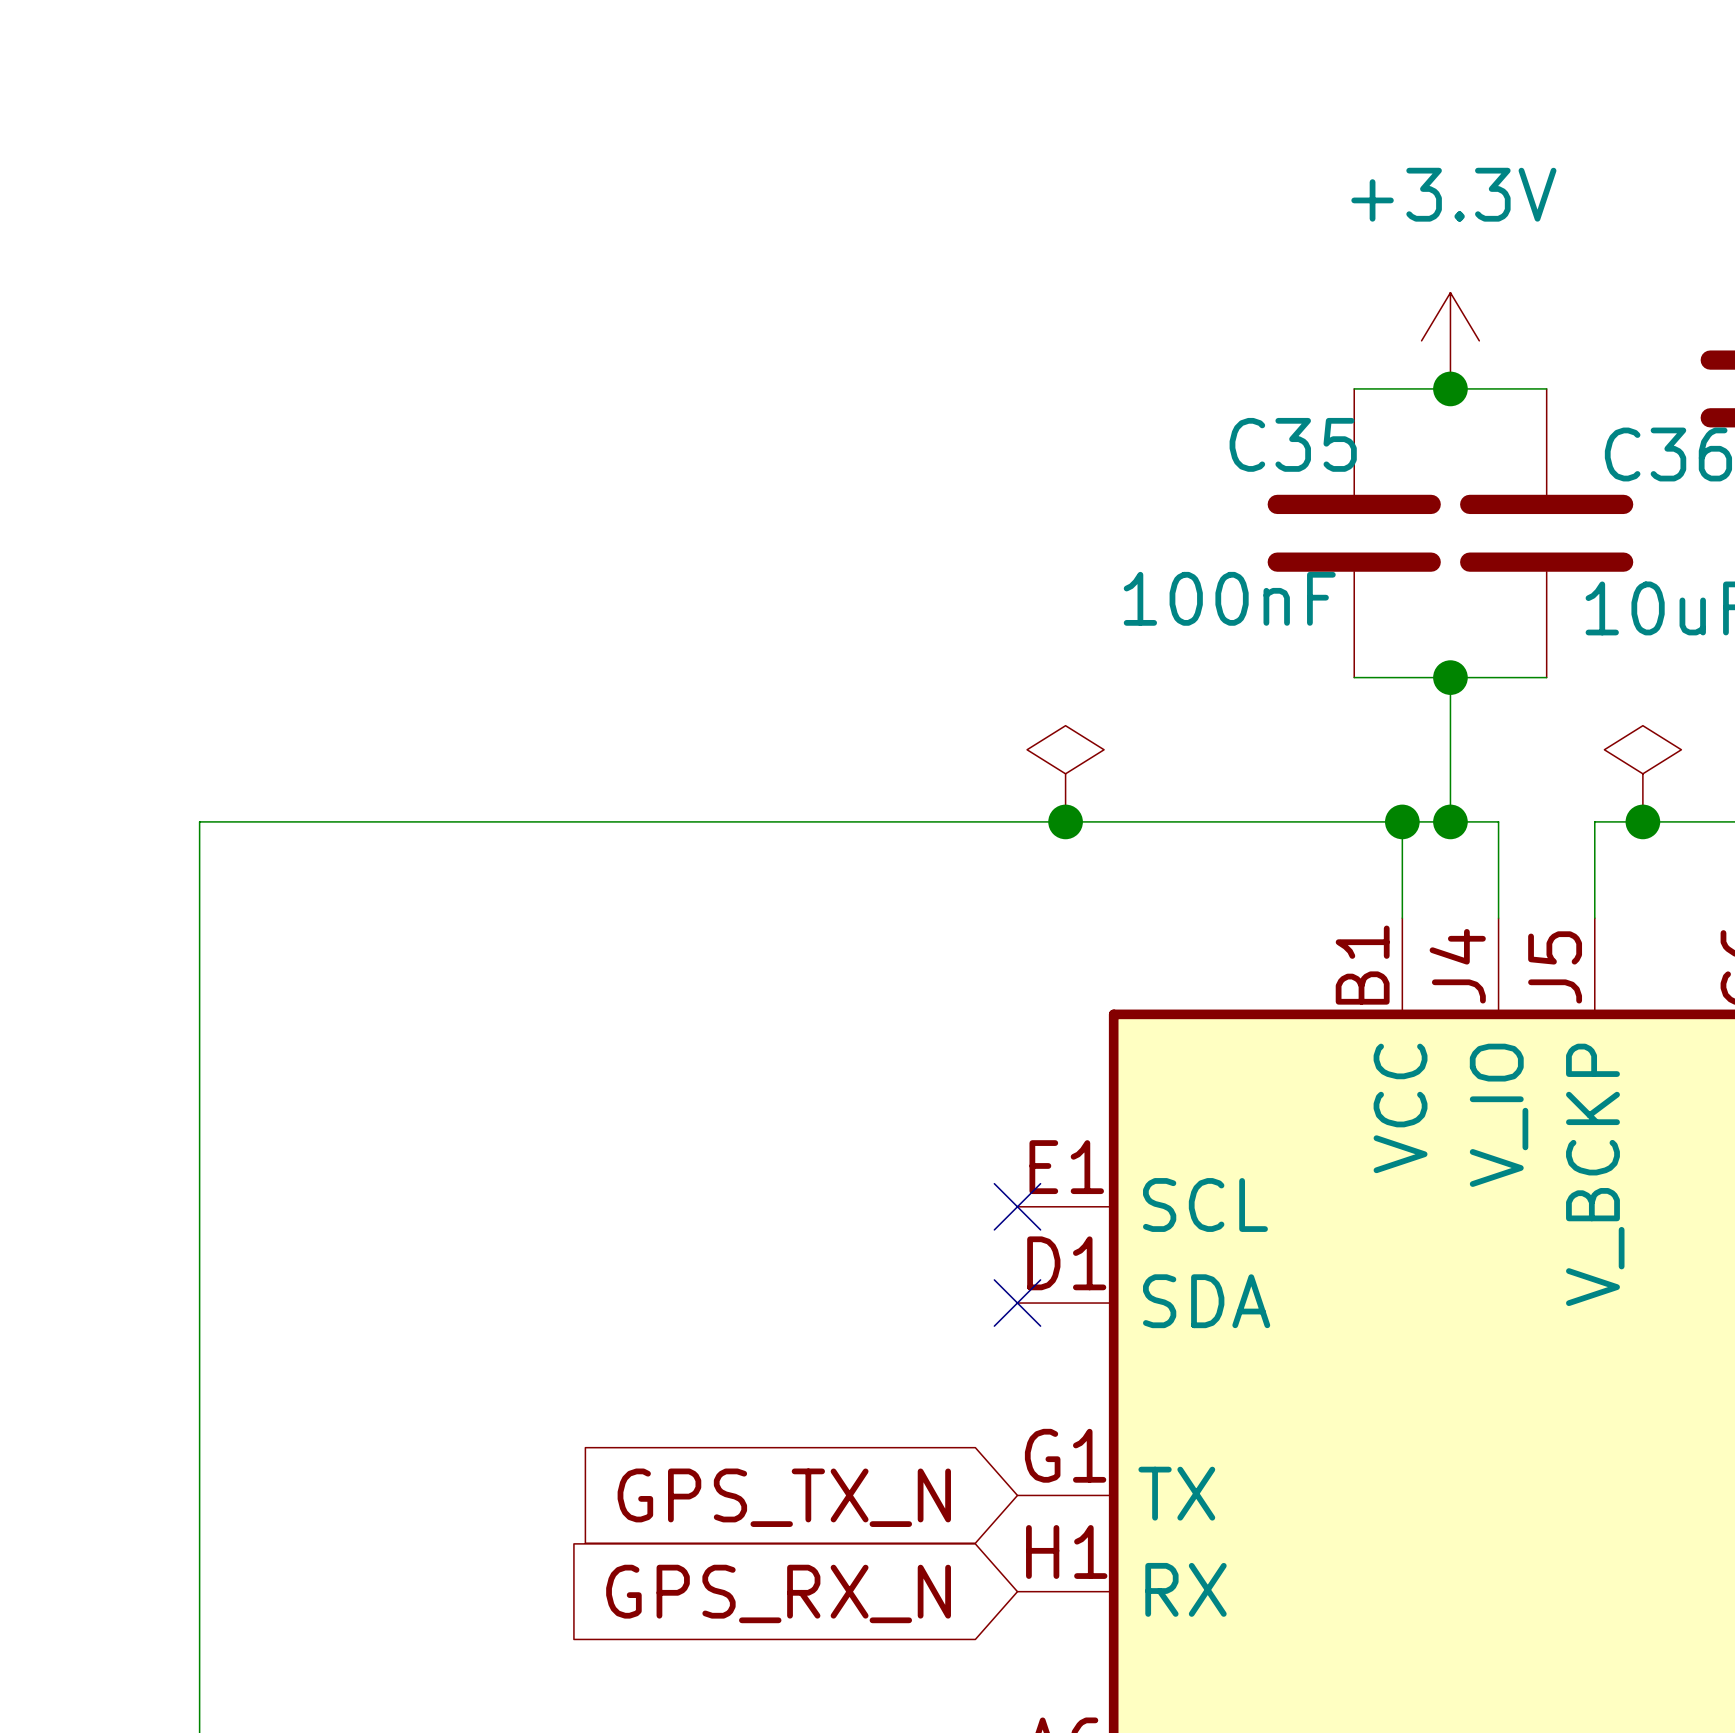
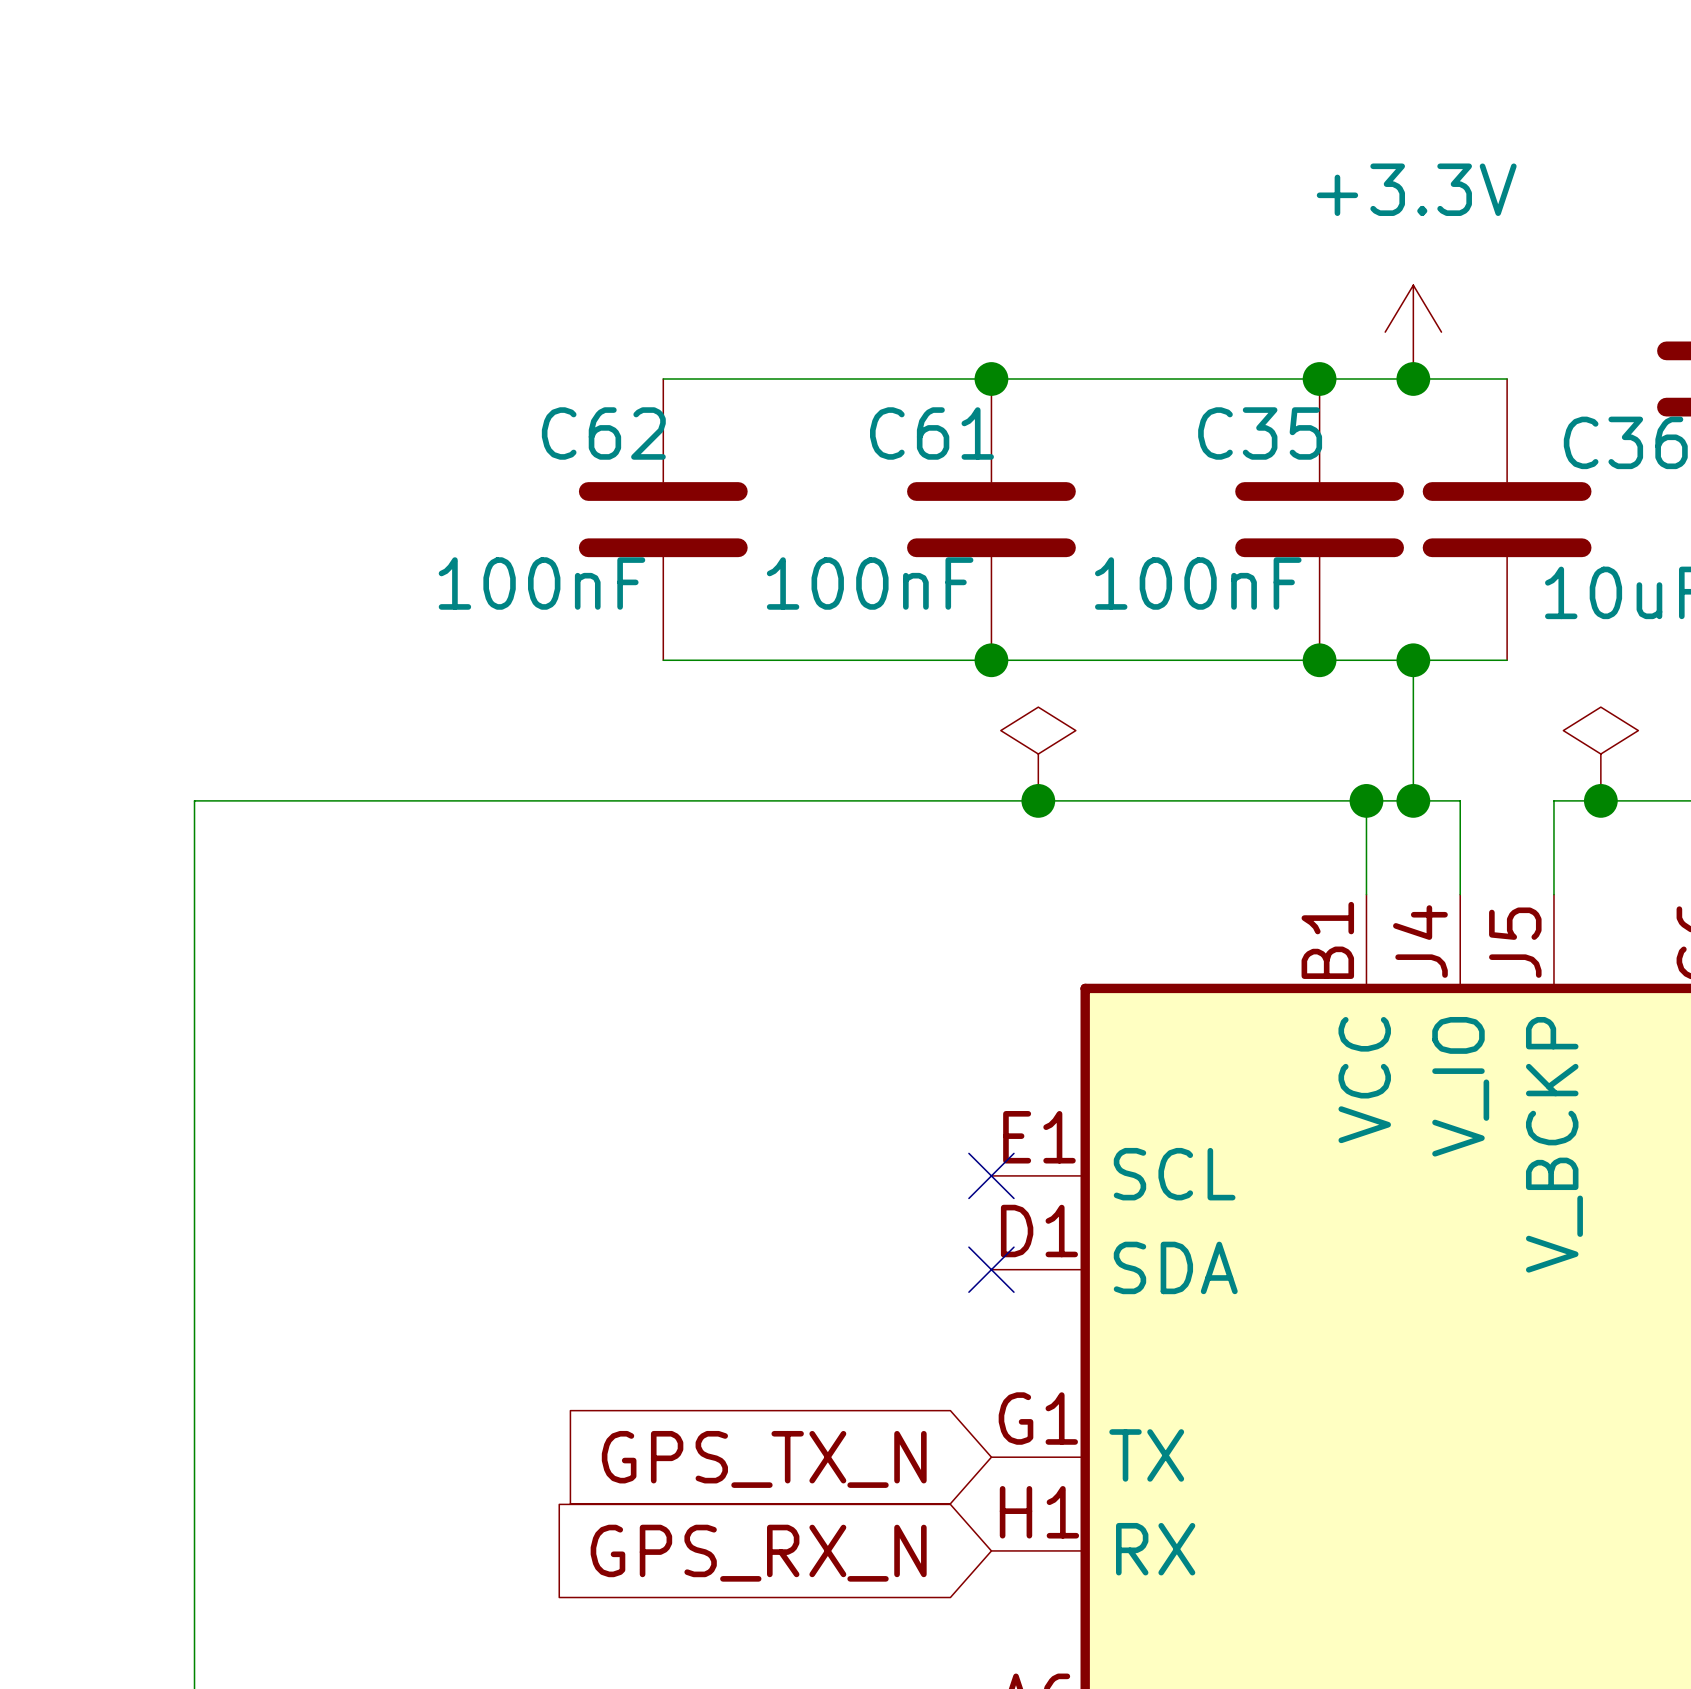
wire: none -> (663, 378) (1319, 378)
junction: none -> (991, 378)
junction: none -> (1319, 378)
C62: none -> 100nF (663, 519)
C61: none -> 100nF (991, 519)
wire: none -> (663, 660) (1319, 660)
junction: none -> (991, 660)
junction: none -> (1319, 660)

